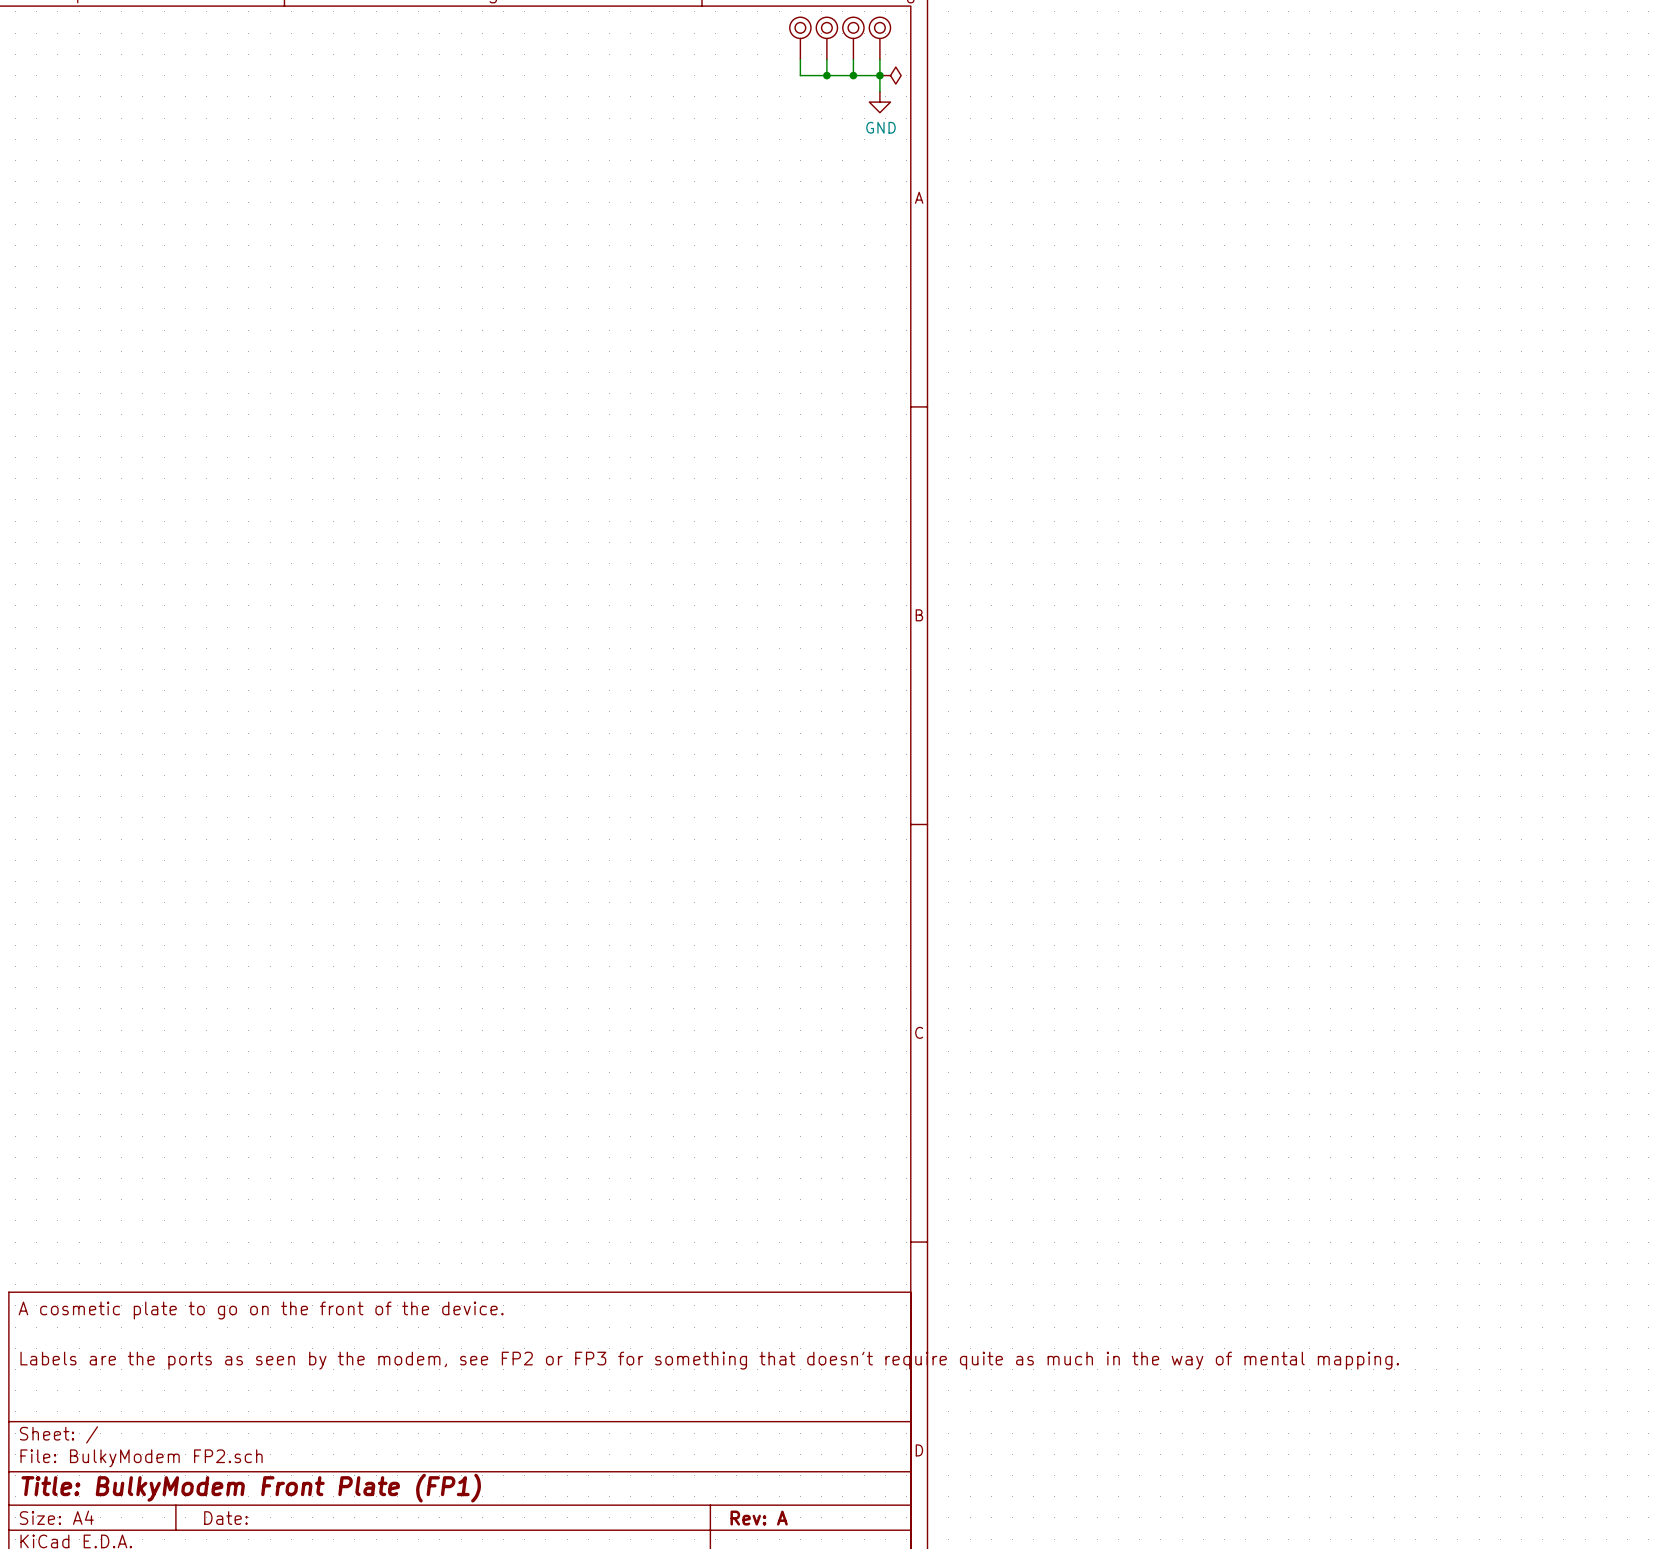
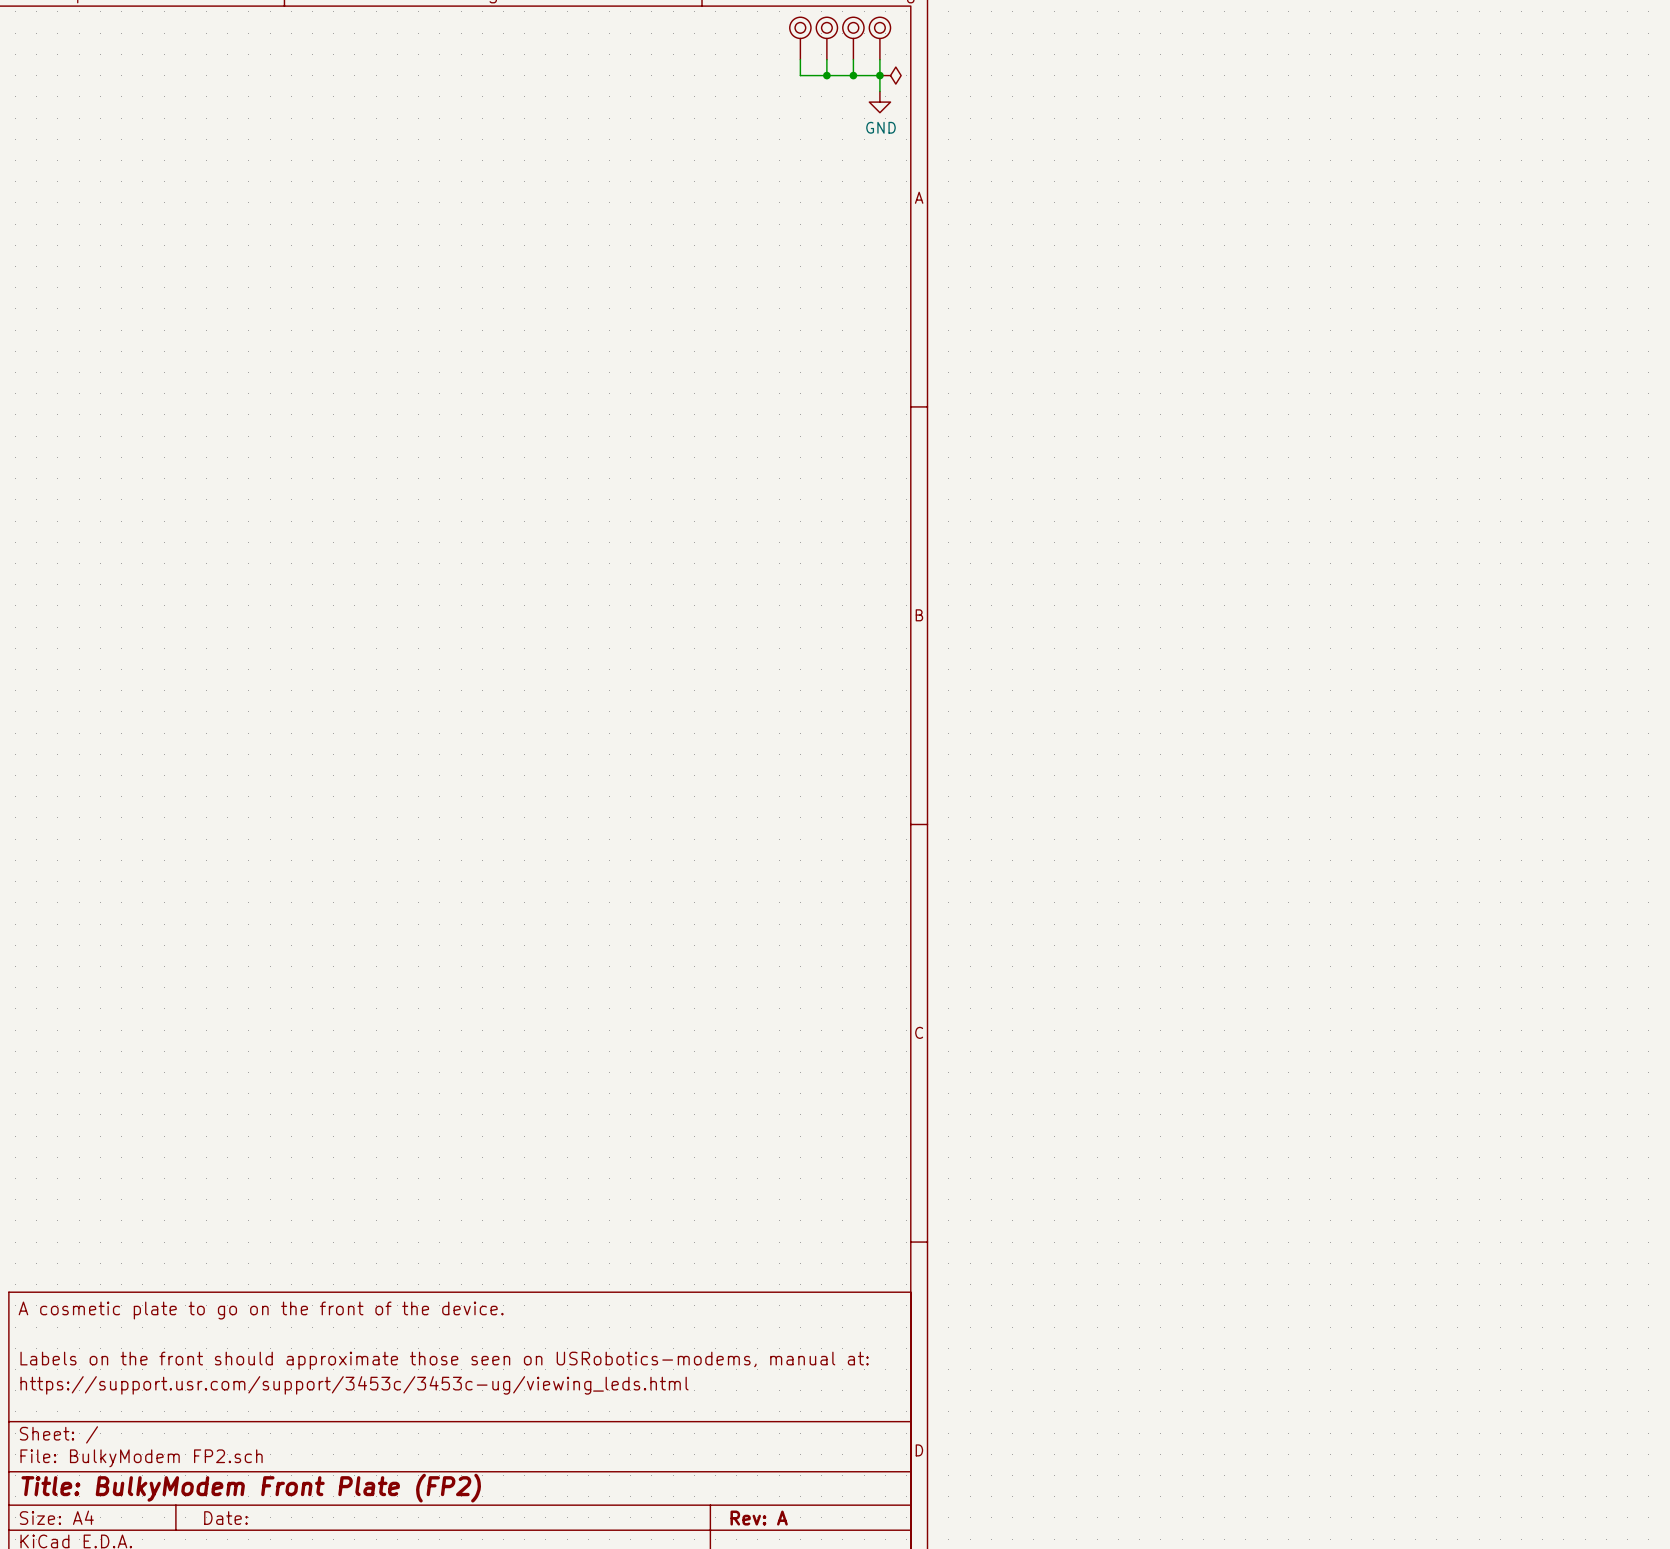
title block: Labels are the ports as seen by the modem, see FP2 or FP3 for something that doesn't require quite as much in the way of mental mapping. (709, 1360) -> Labels on the front should approximate those seen on USRobotics-modems, manual at: (444, 1360)
title block: none -> https://support.usr.com/support/3453c/3453c-ug/viewing_leds.html (354, 1385)
title block: Title: BulkyModem Front Plate (FP1) (251, 1488) -> Title: BulkyModem Front Plate (FP2) (251, 1488)

